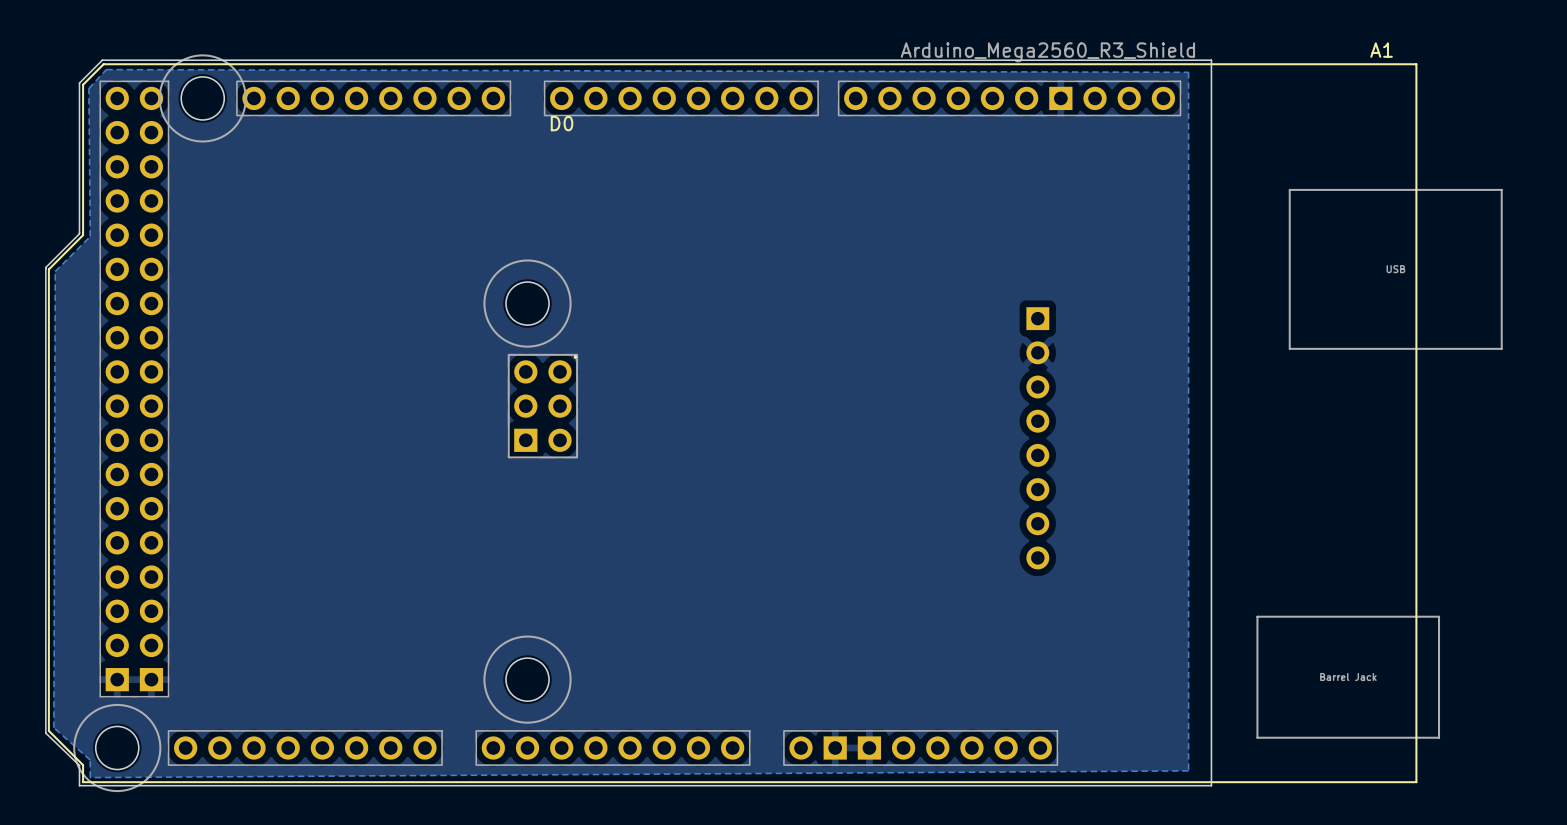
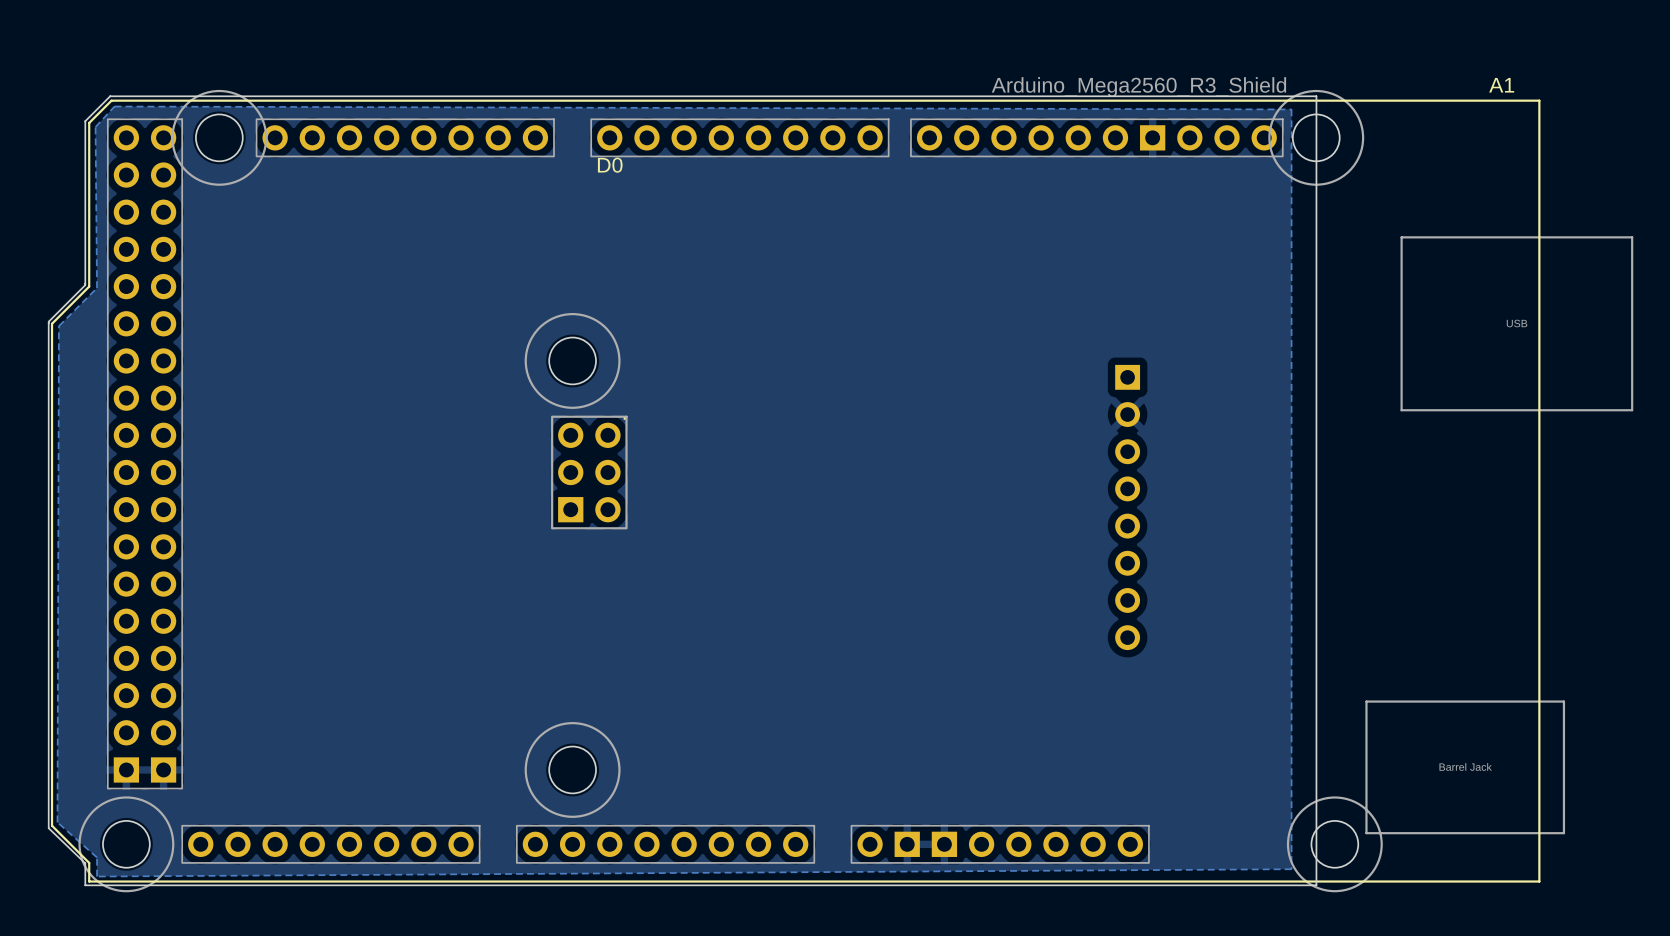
A1 footprint: [47, 54, 1503, 793] -> [50, 89, 1634, 893]

